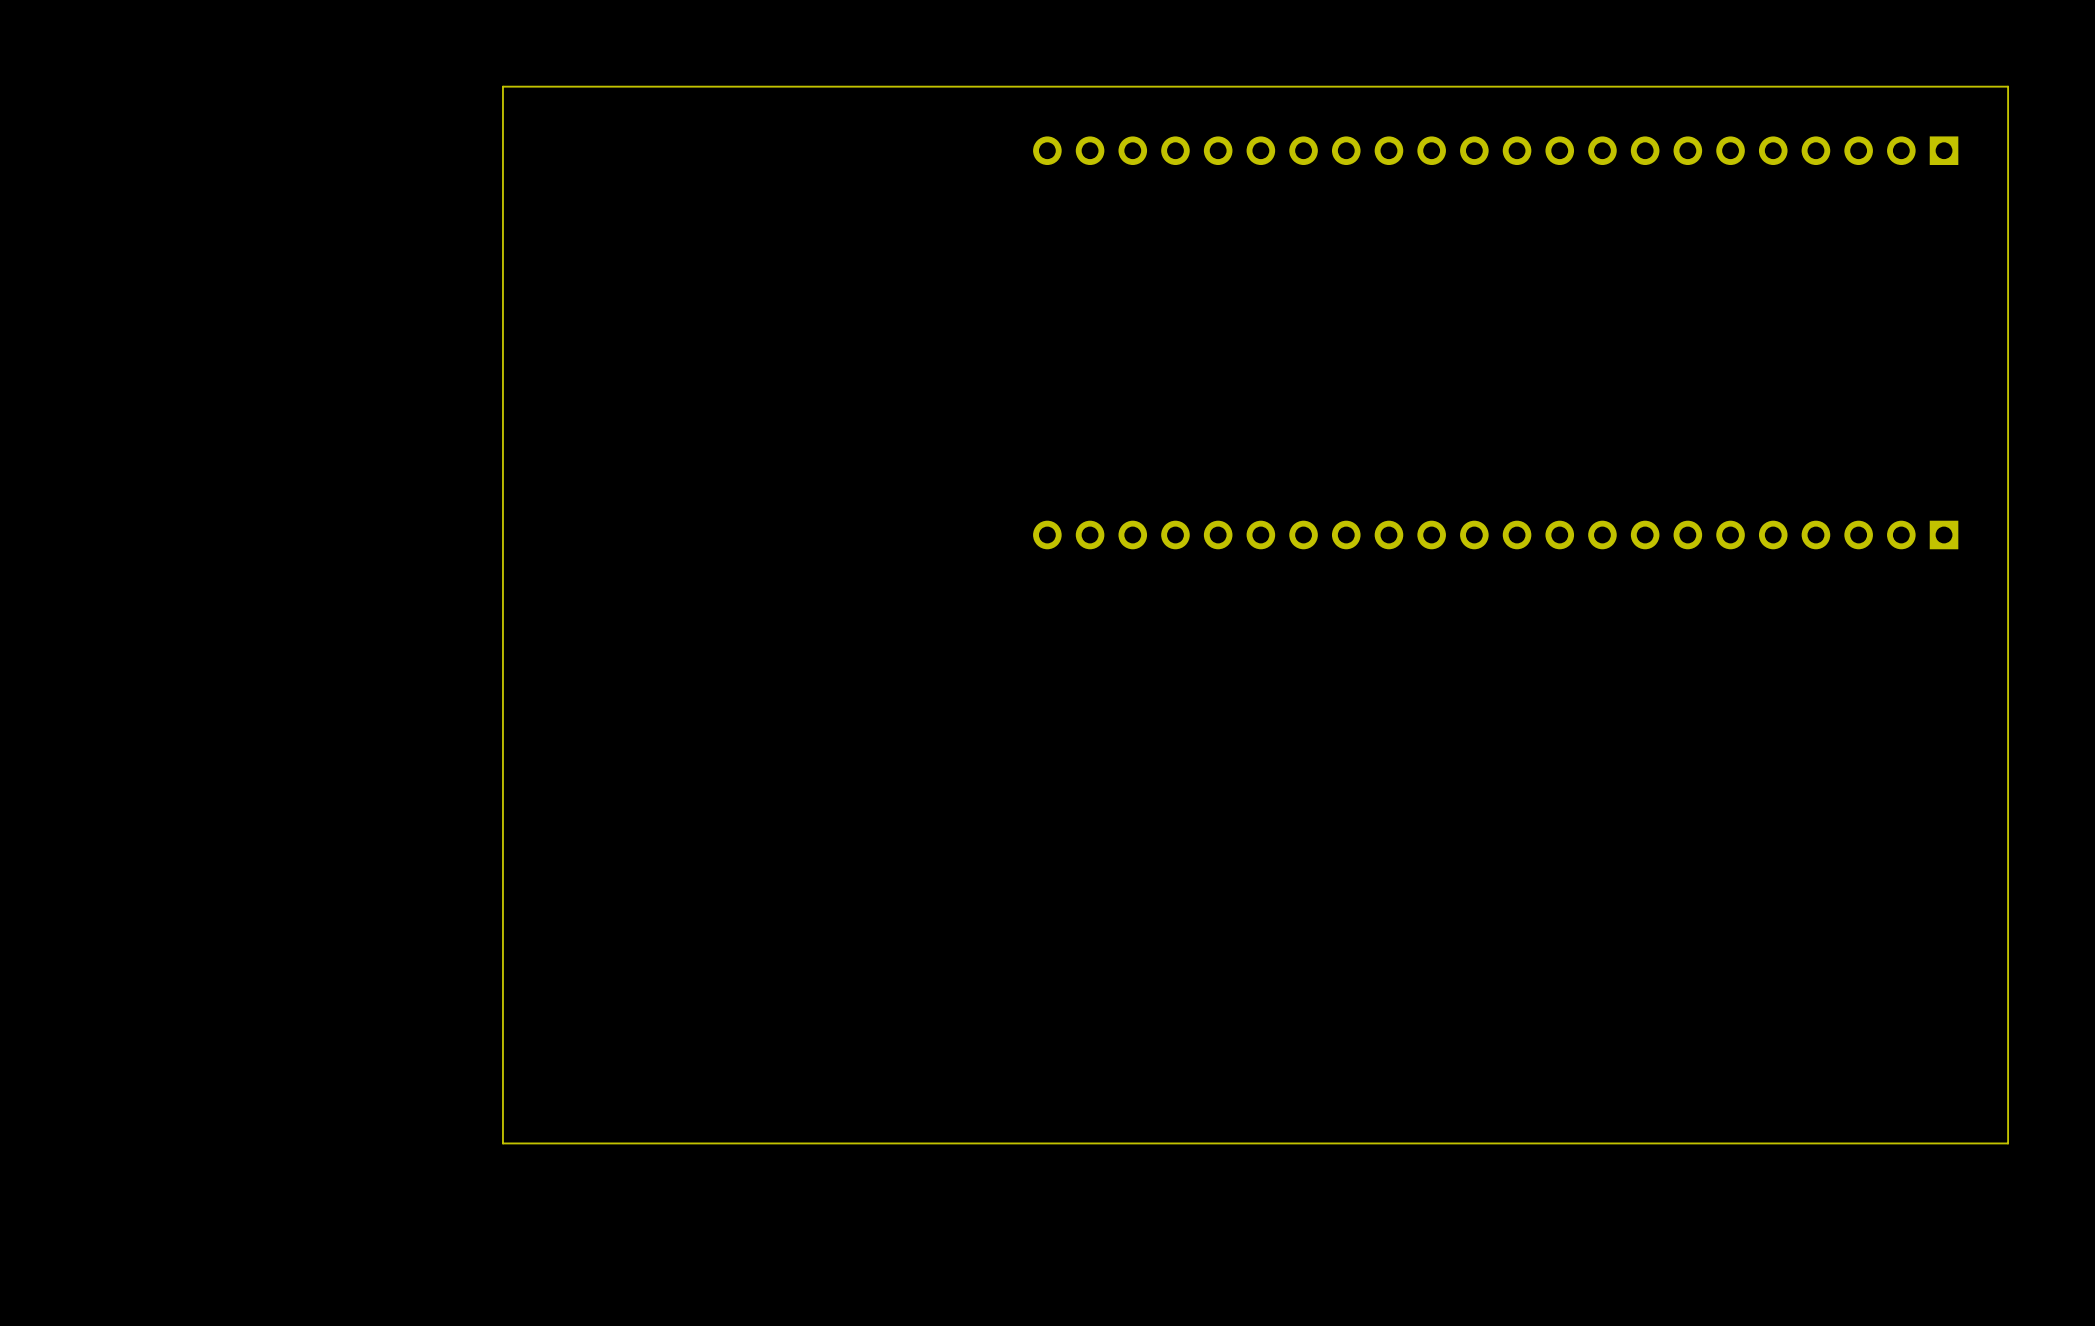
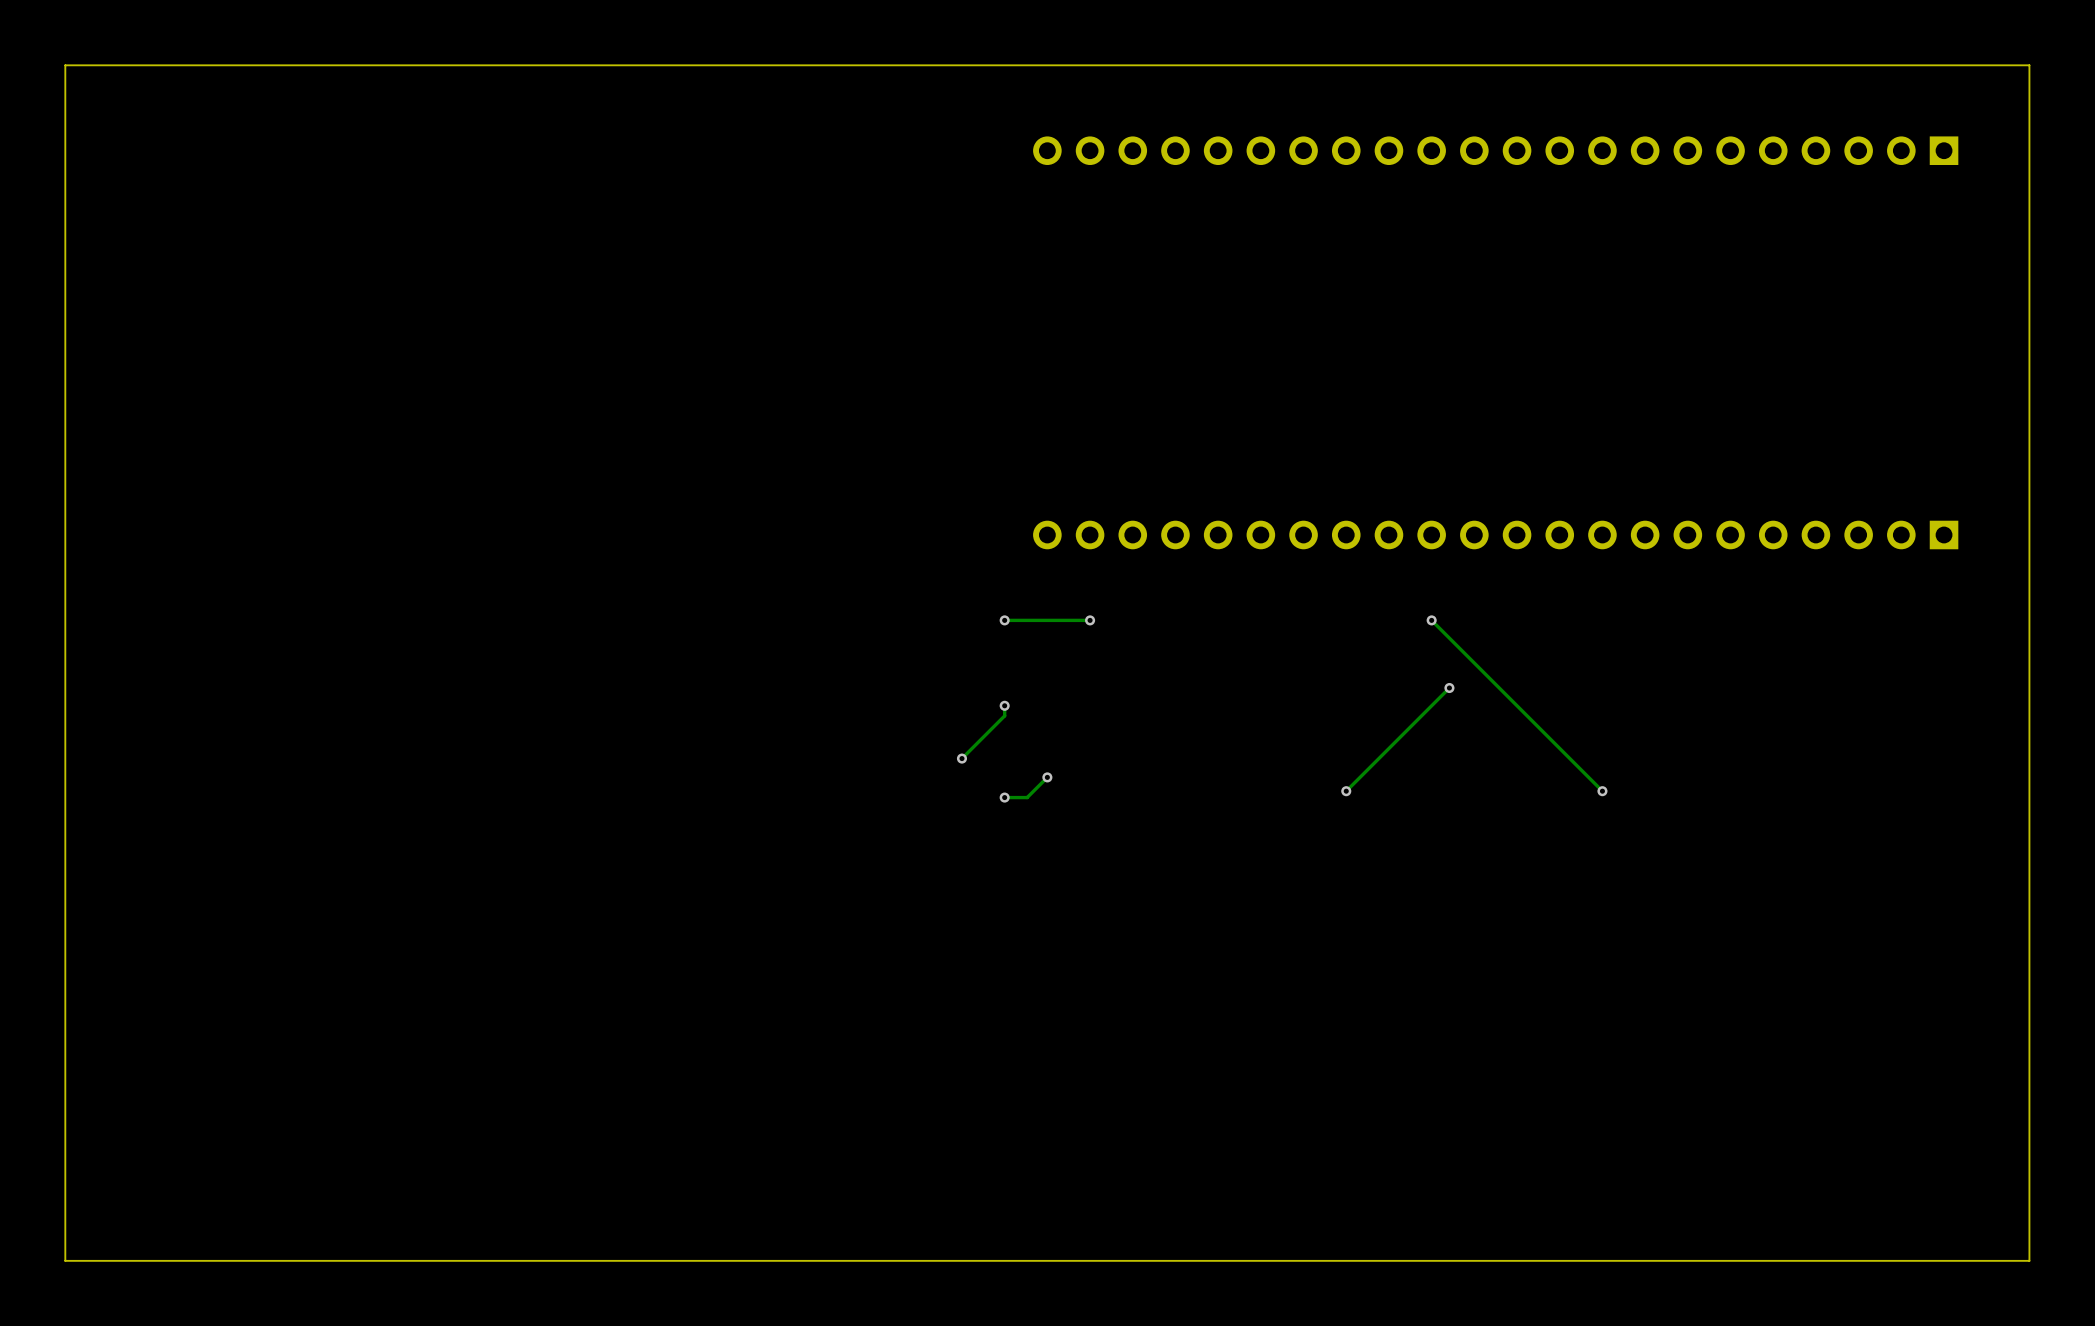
board edge: (2008, 86) (502, 86) (502, 1143) (2008, 1143) (2008, 86) -> (2029, 65) (2029, 1260) (65, 1260) (65, 65) (2029, 65)
via: none -> (1004, 620)
track: none -> (1090, 620) (1004, 620)
via: none -> (1090, 620)
track: none -> (1431, 620) (1602, 791)
via: none -> (1431, 620)
track: none -> (1449, 688) (1346, 791)
via: none -> (1449, 688)
track: none -> (1004, 705) (1004, 715) (961, 758)
via: none -> (1004, 705)
via: none -> (961, 758)
track: none -> (1047, 777) (1027, 797) (1004, 797)
via: none -> (1047, 777)
via: none -> (1346, 791)
via: none -> (1602, 791)
via: none -> (1004, 797)

